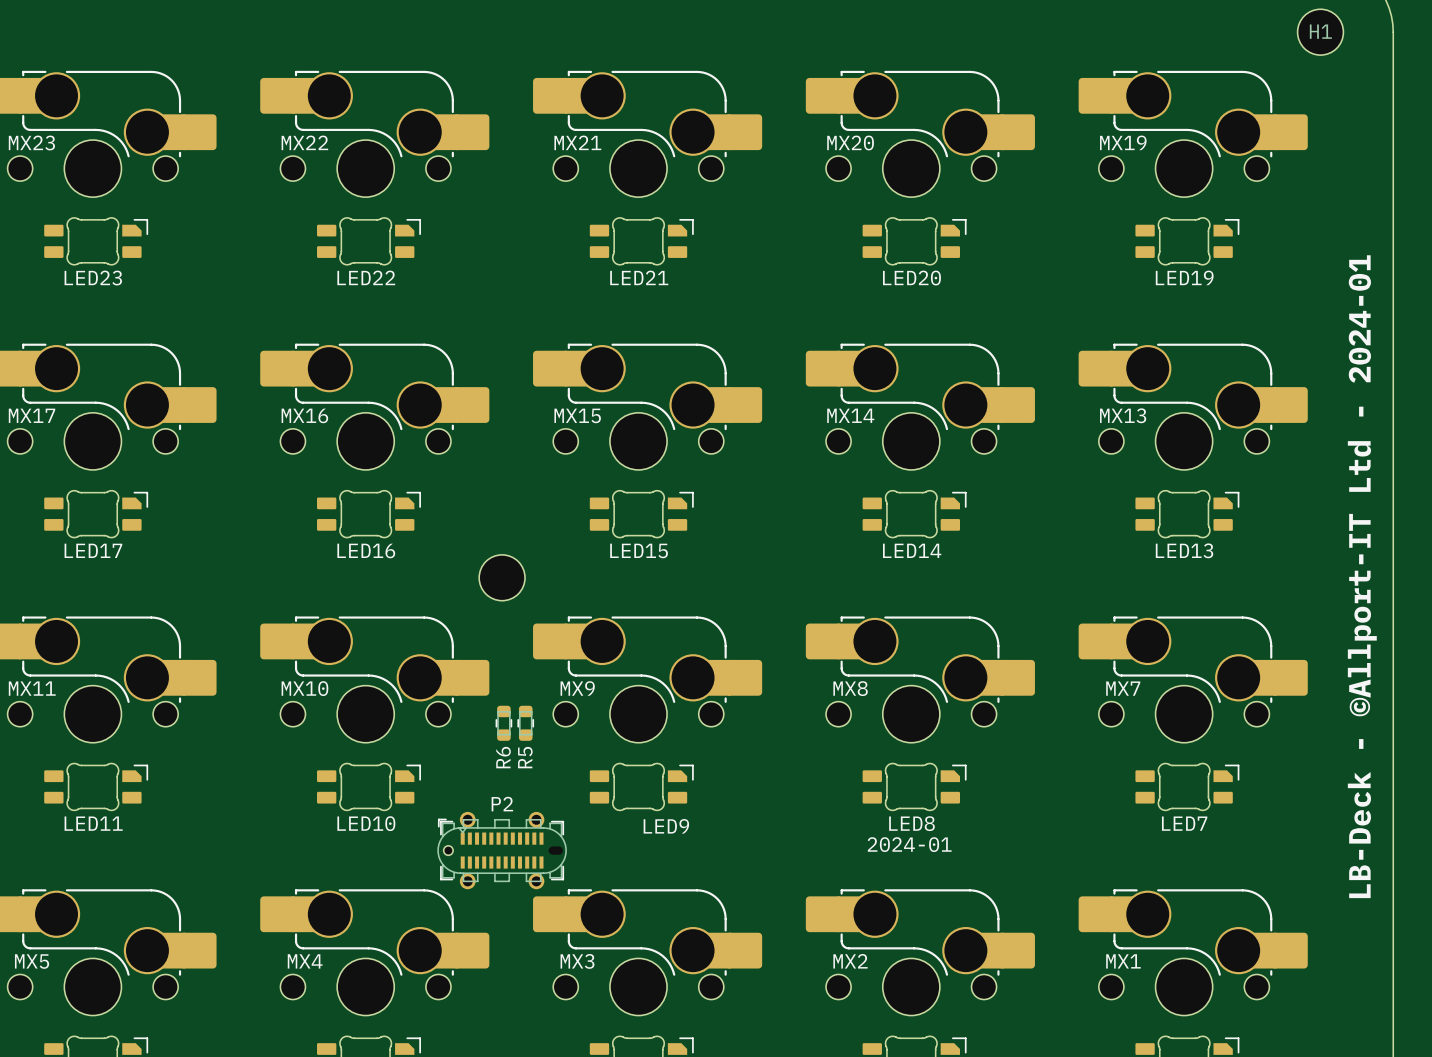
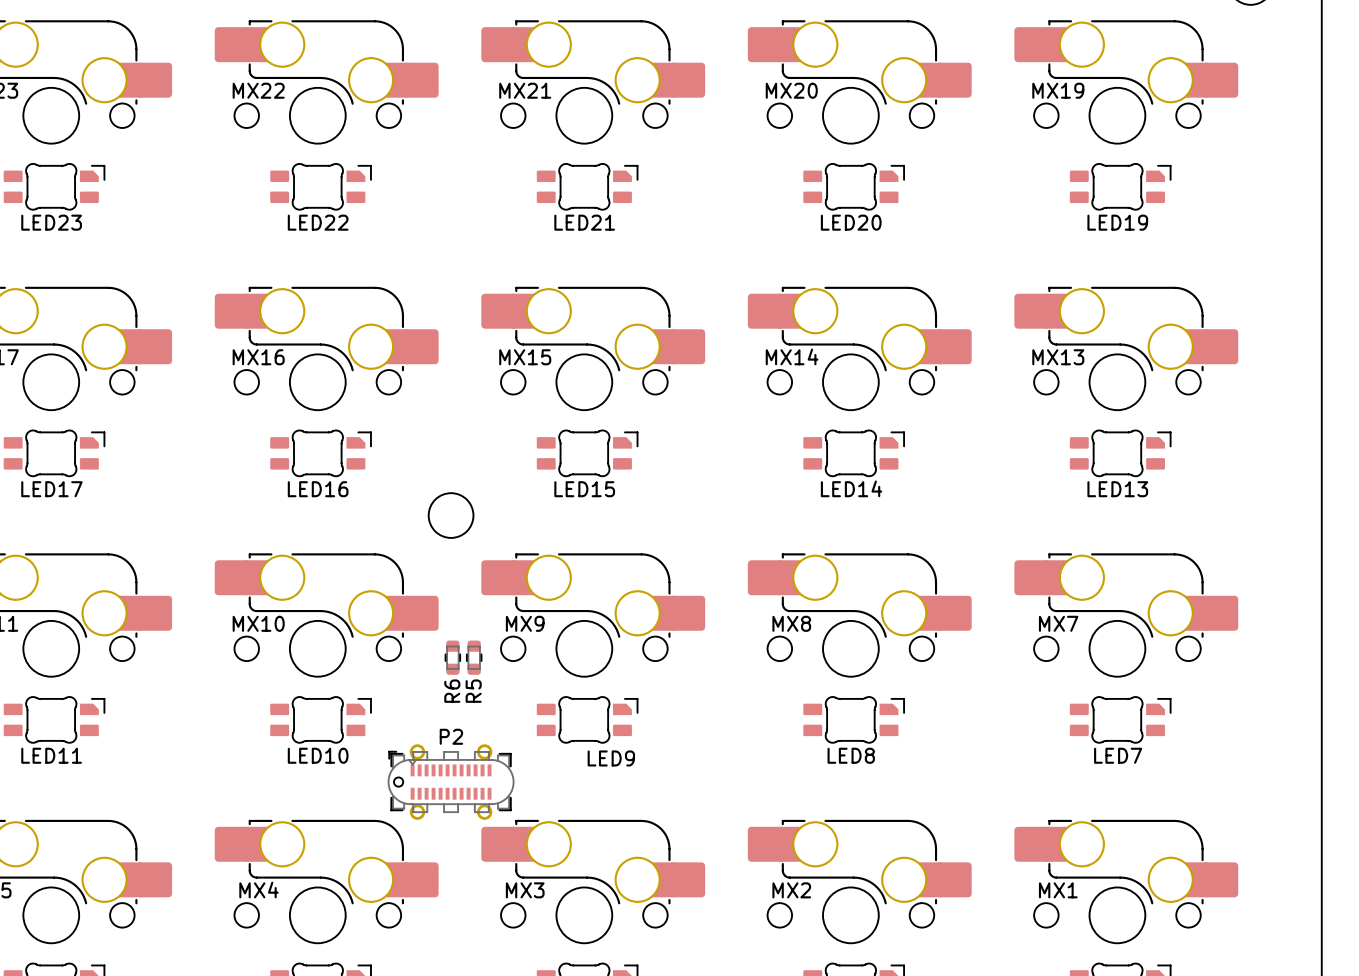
text: LB-Deck - ©Allport-IT Ltd - 2024-01 (1362, 576) -> none
text: 2024-01 (909, 844) -> none

